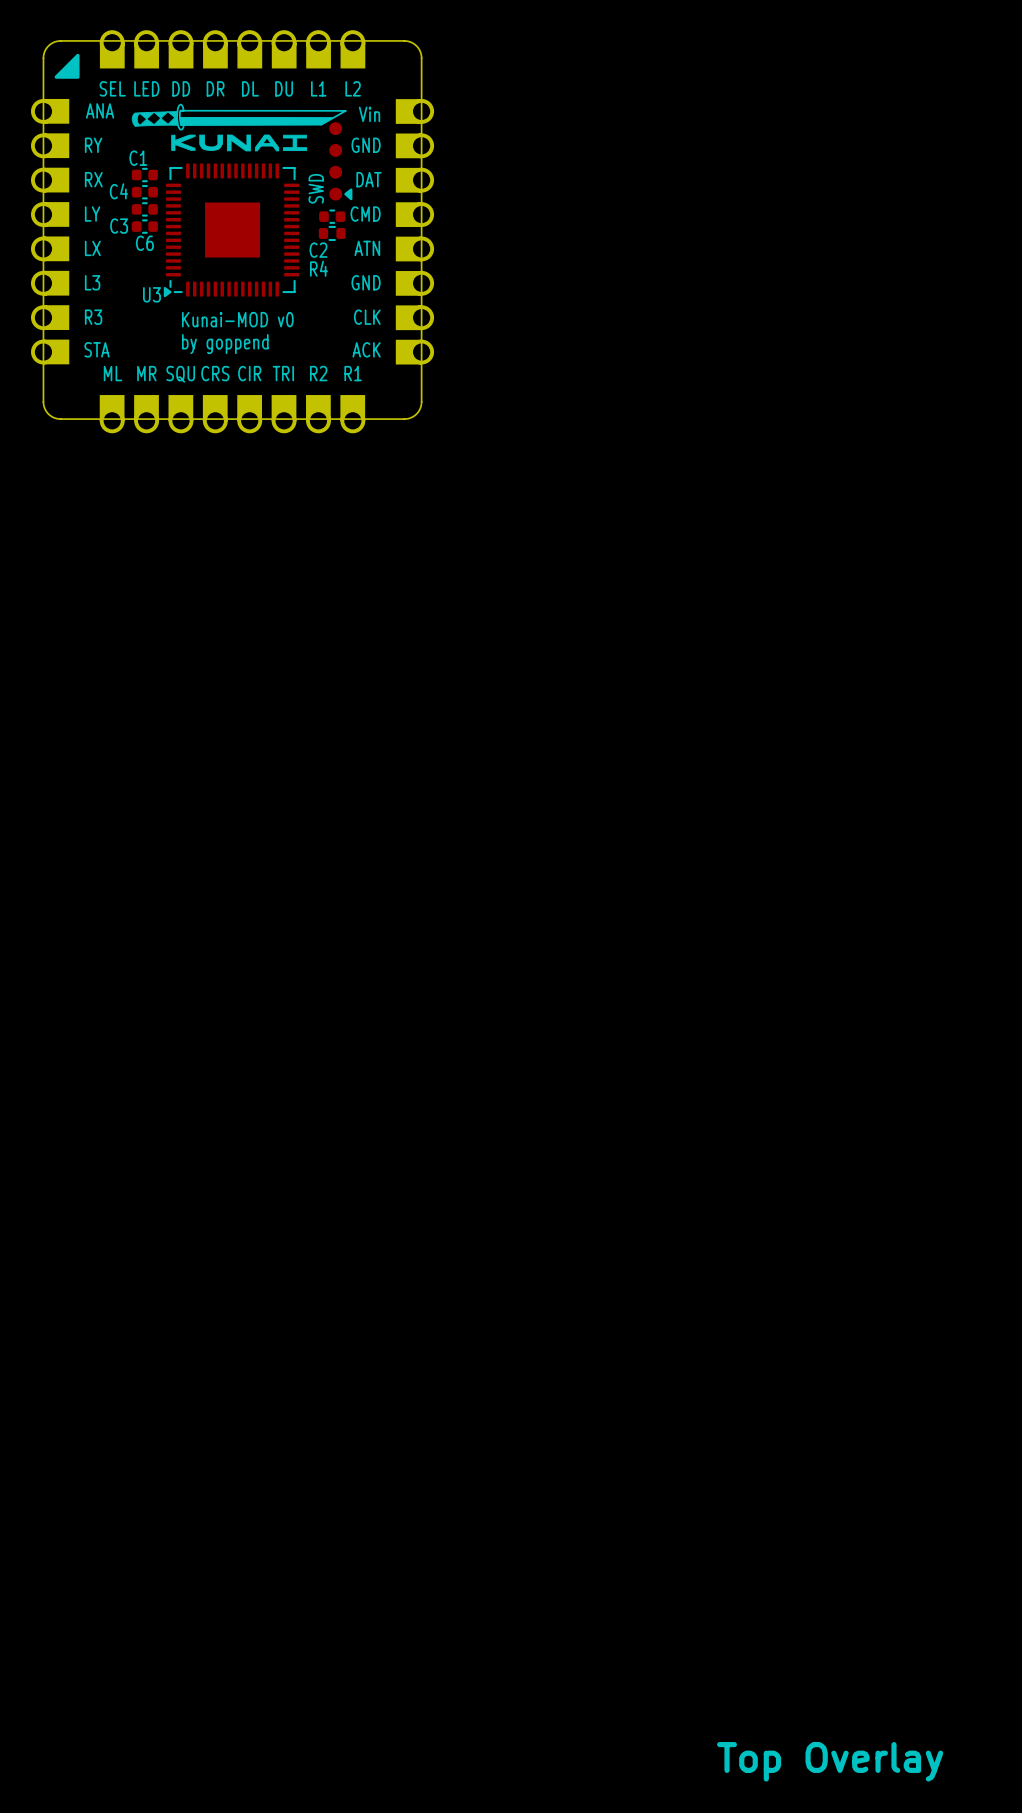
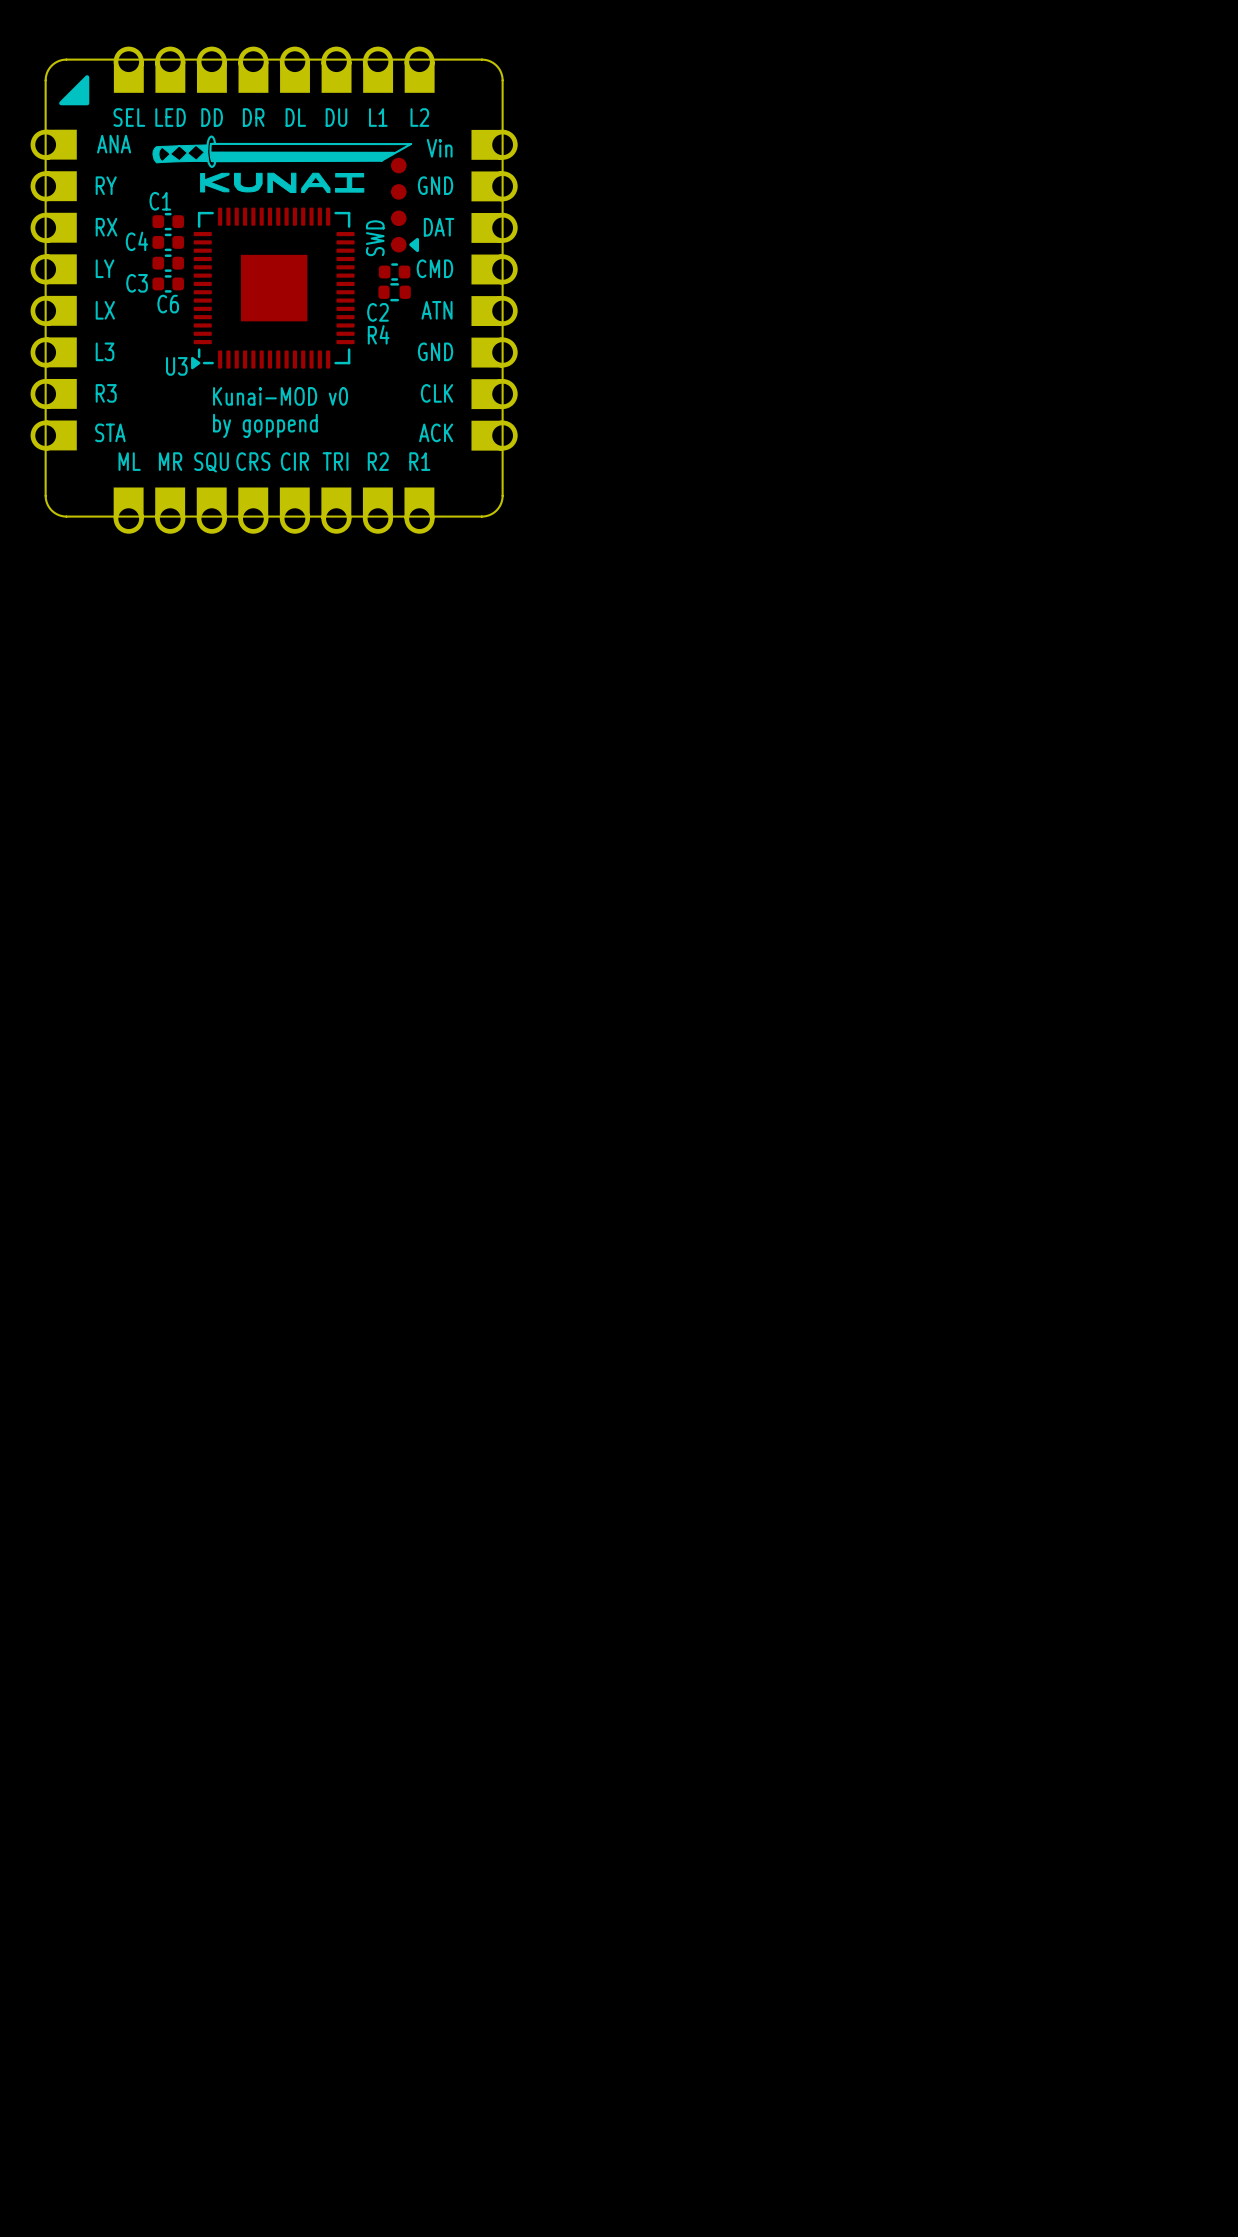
text: Top Overlay (830, 1761) -> none

